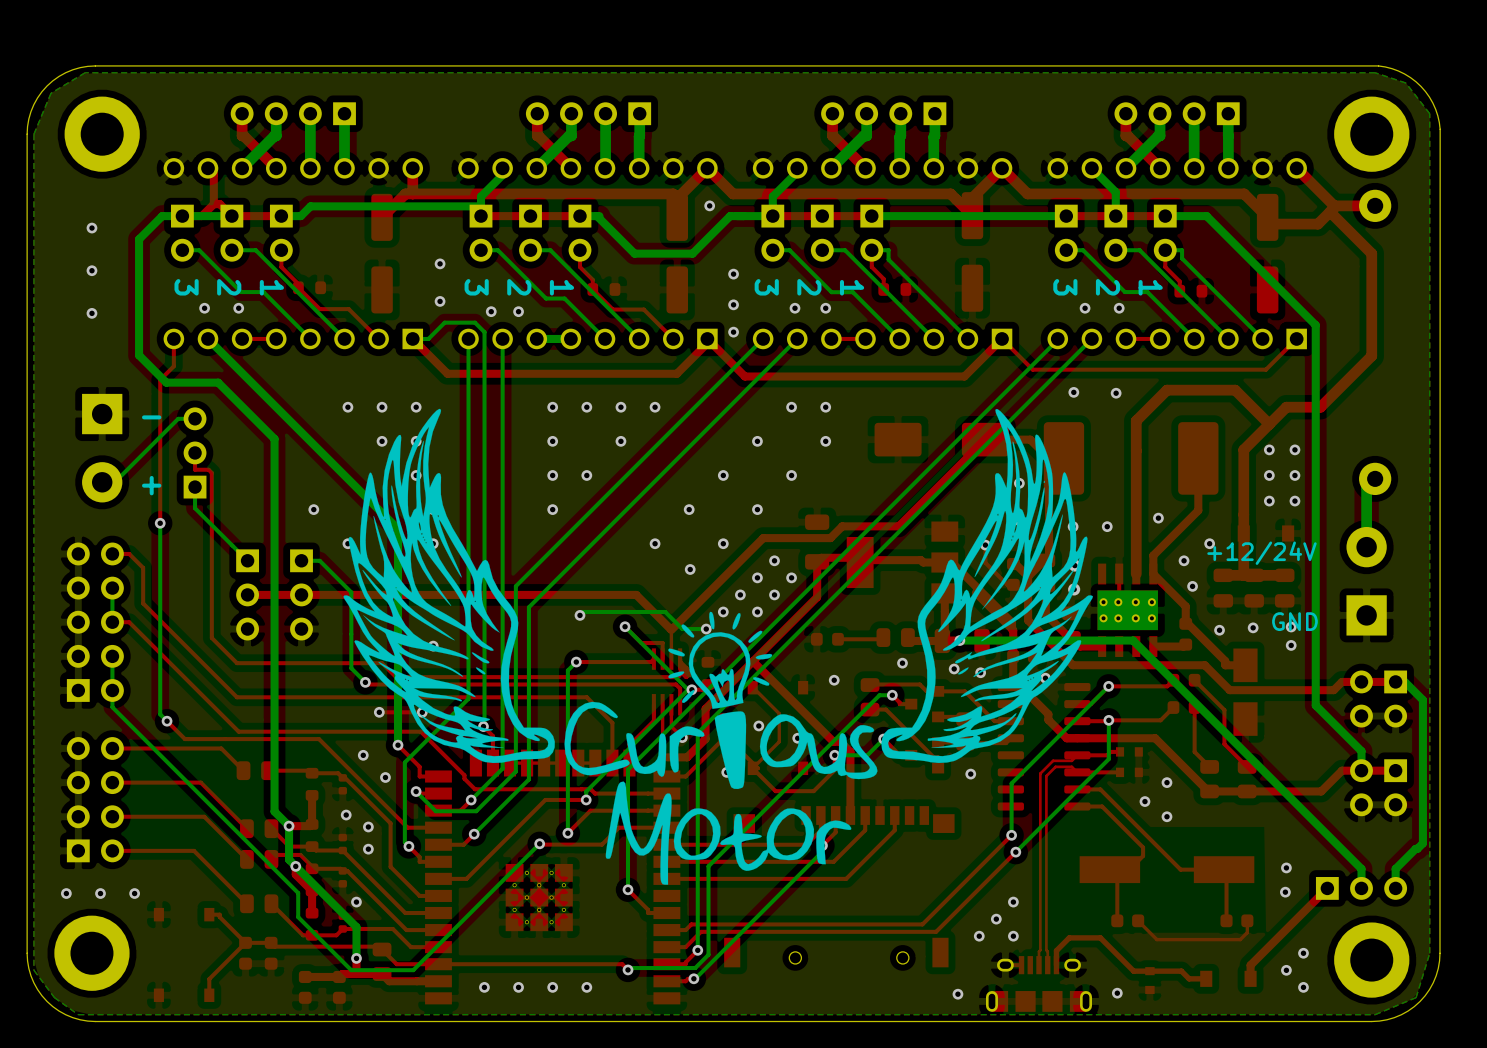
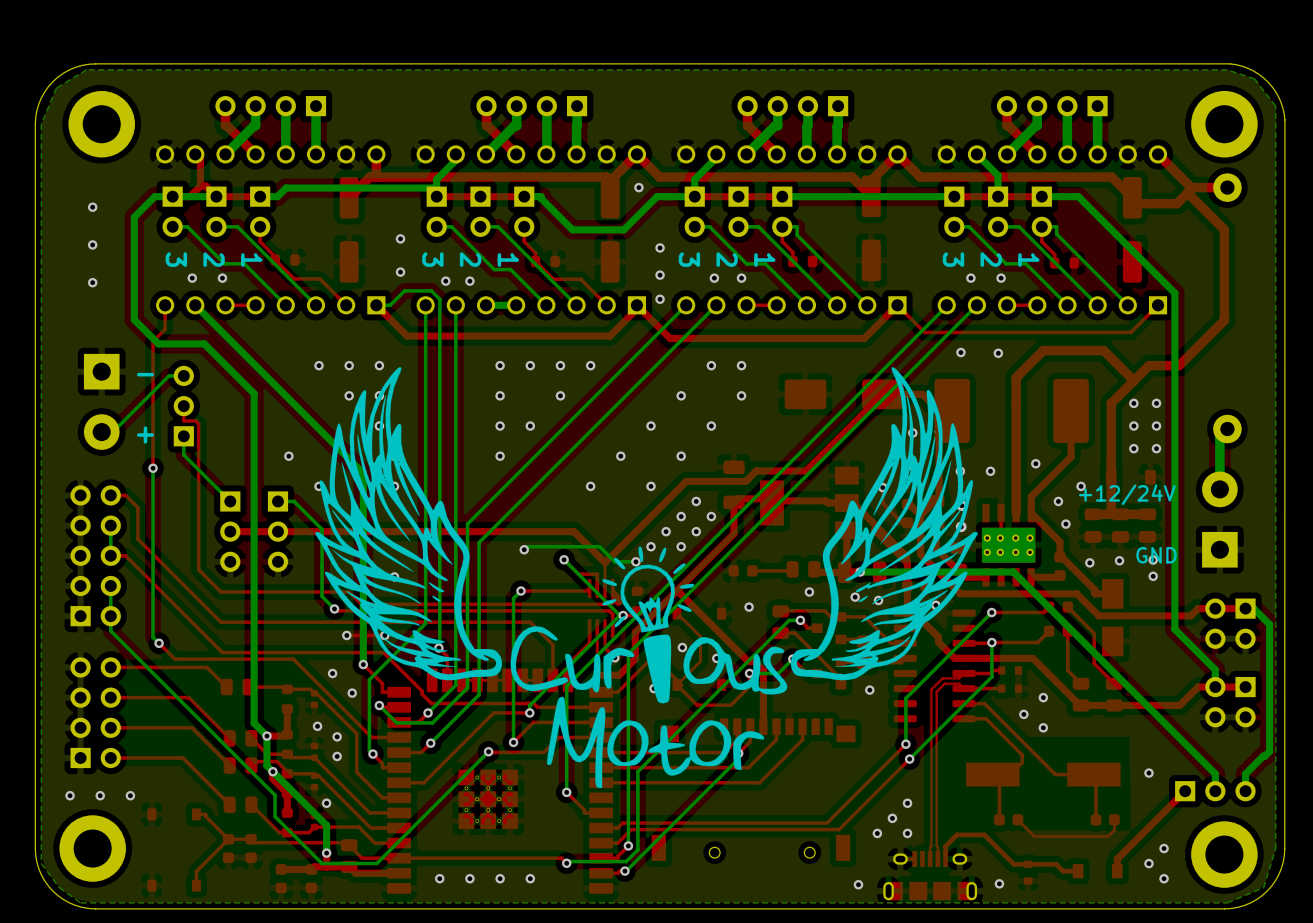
via: (690, 569) -> none
via: (1285, 892) -> none

